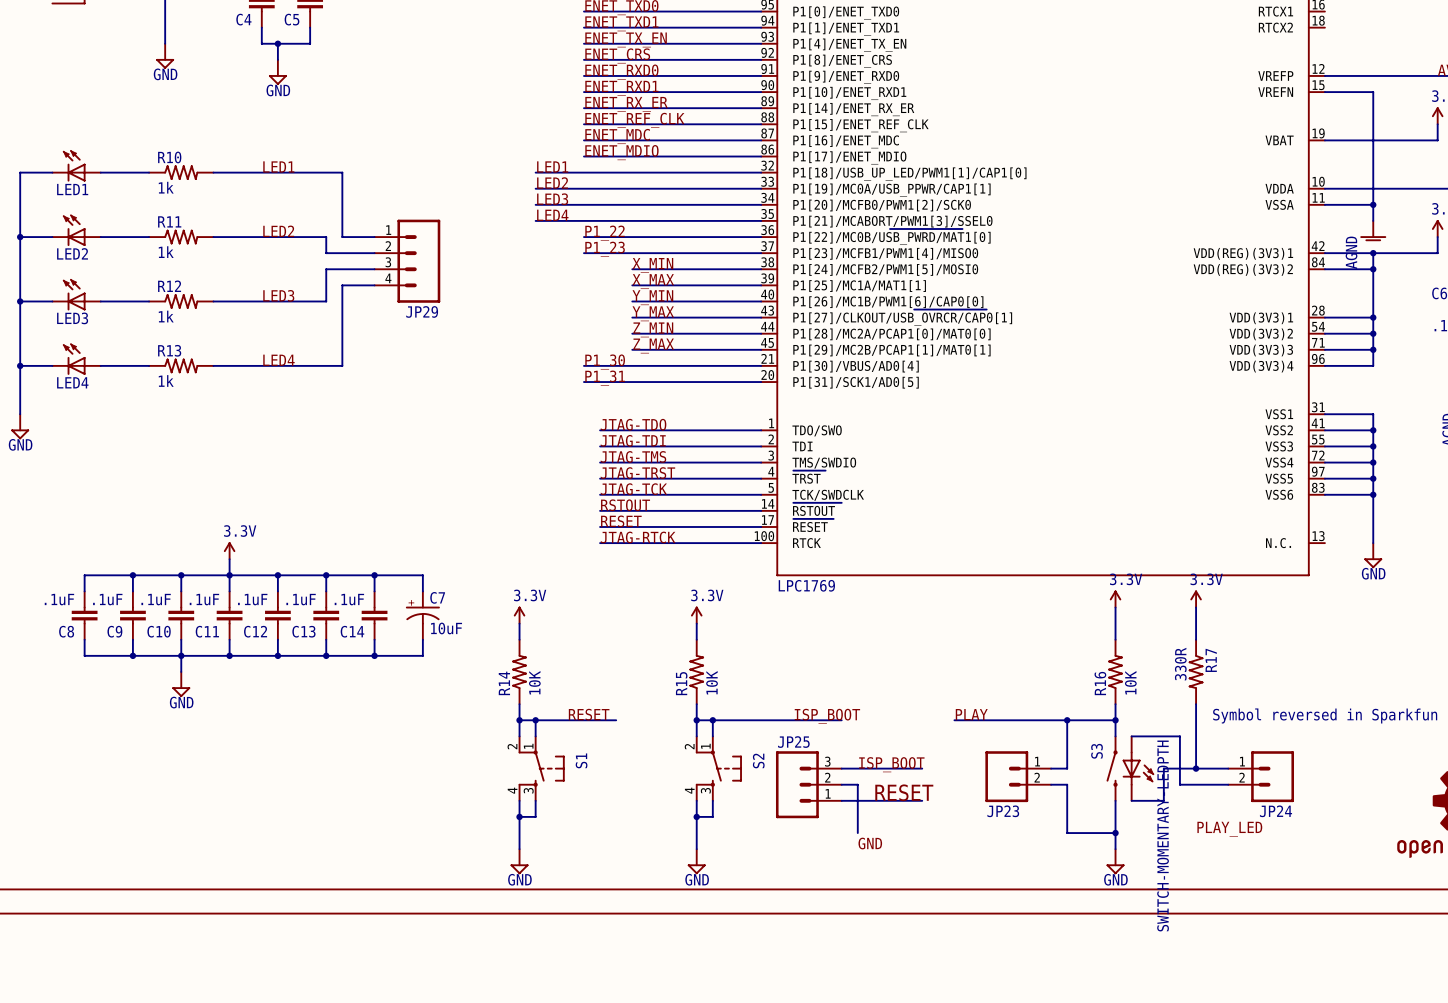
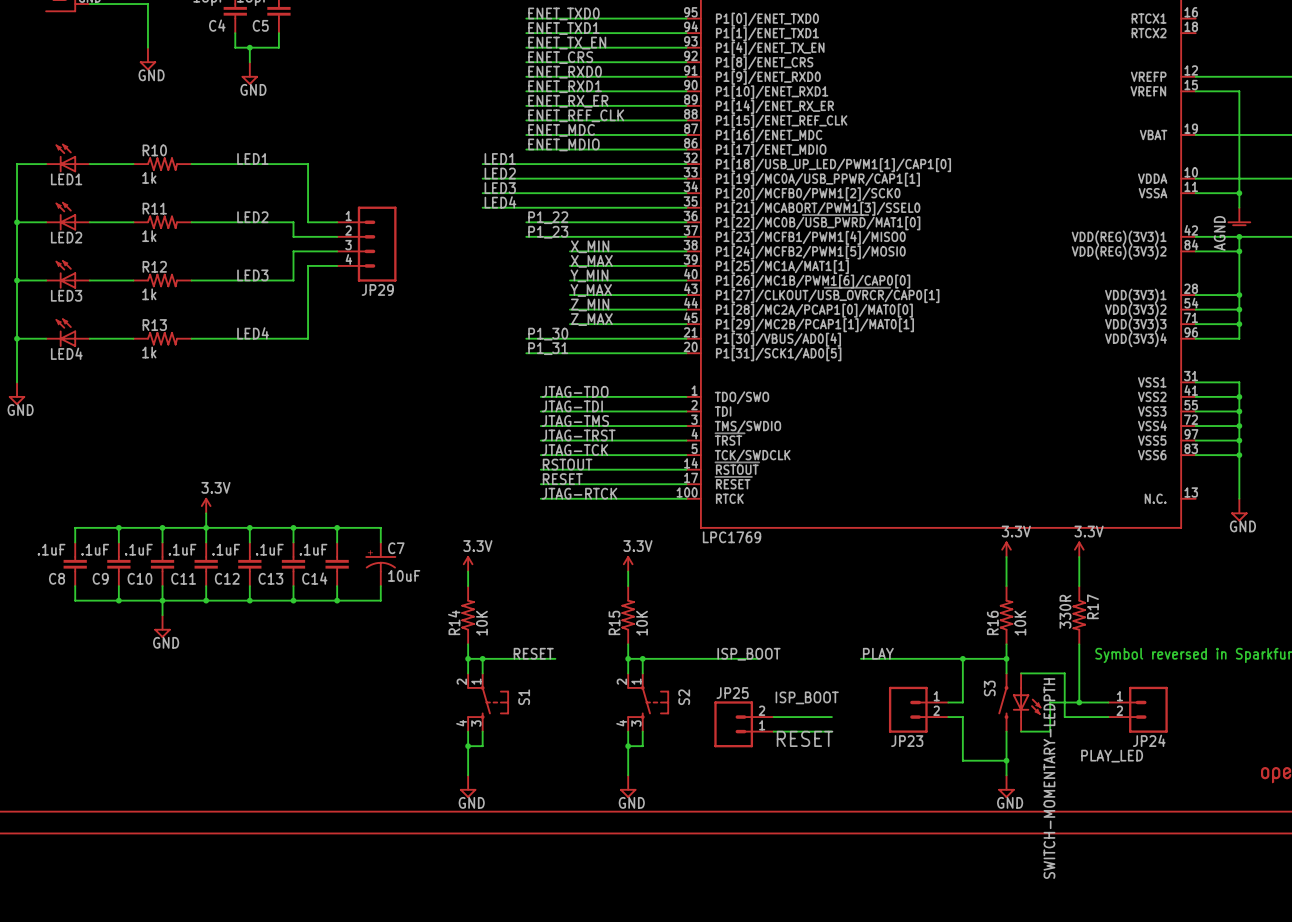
JP25 symbol: [775, 751, 842, 819] -> [714, 701, 774, 748]
wire: (841, 768) (922, 768) -> none
wire: (841, 784) (857, 784) (857, 833) -> none
wire: none -> (773, 717) (831, 717)
label position: RESET (904, 792) -> RESET (805, 738)
label: GND (870, 843) -> none

